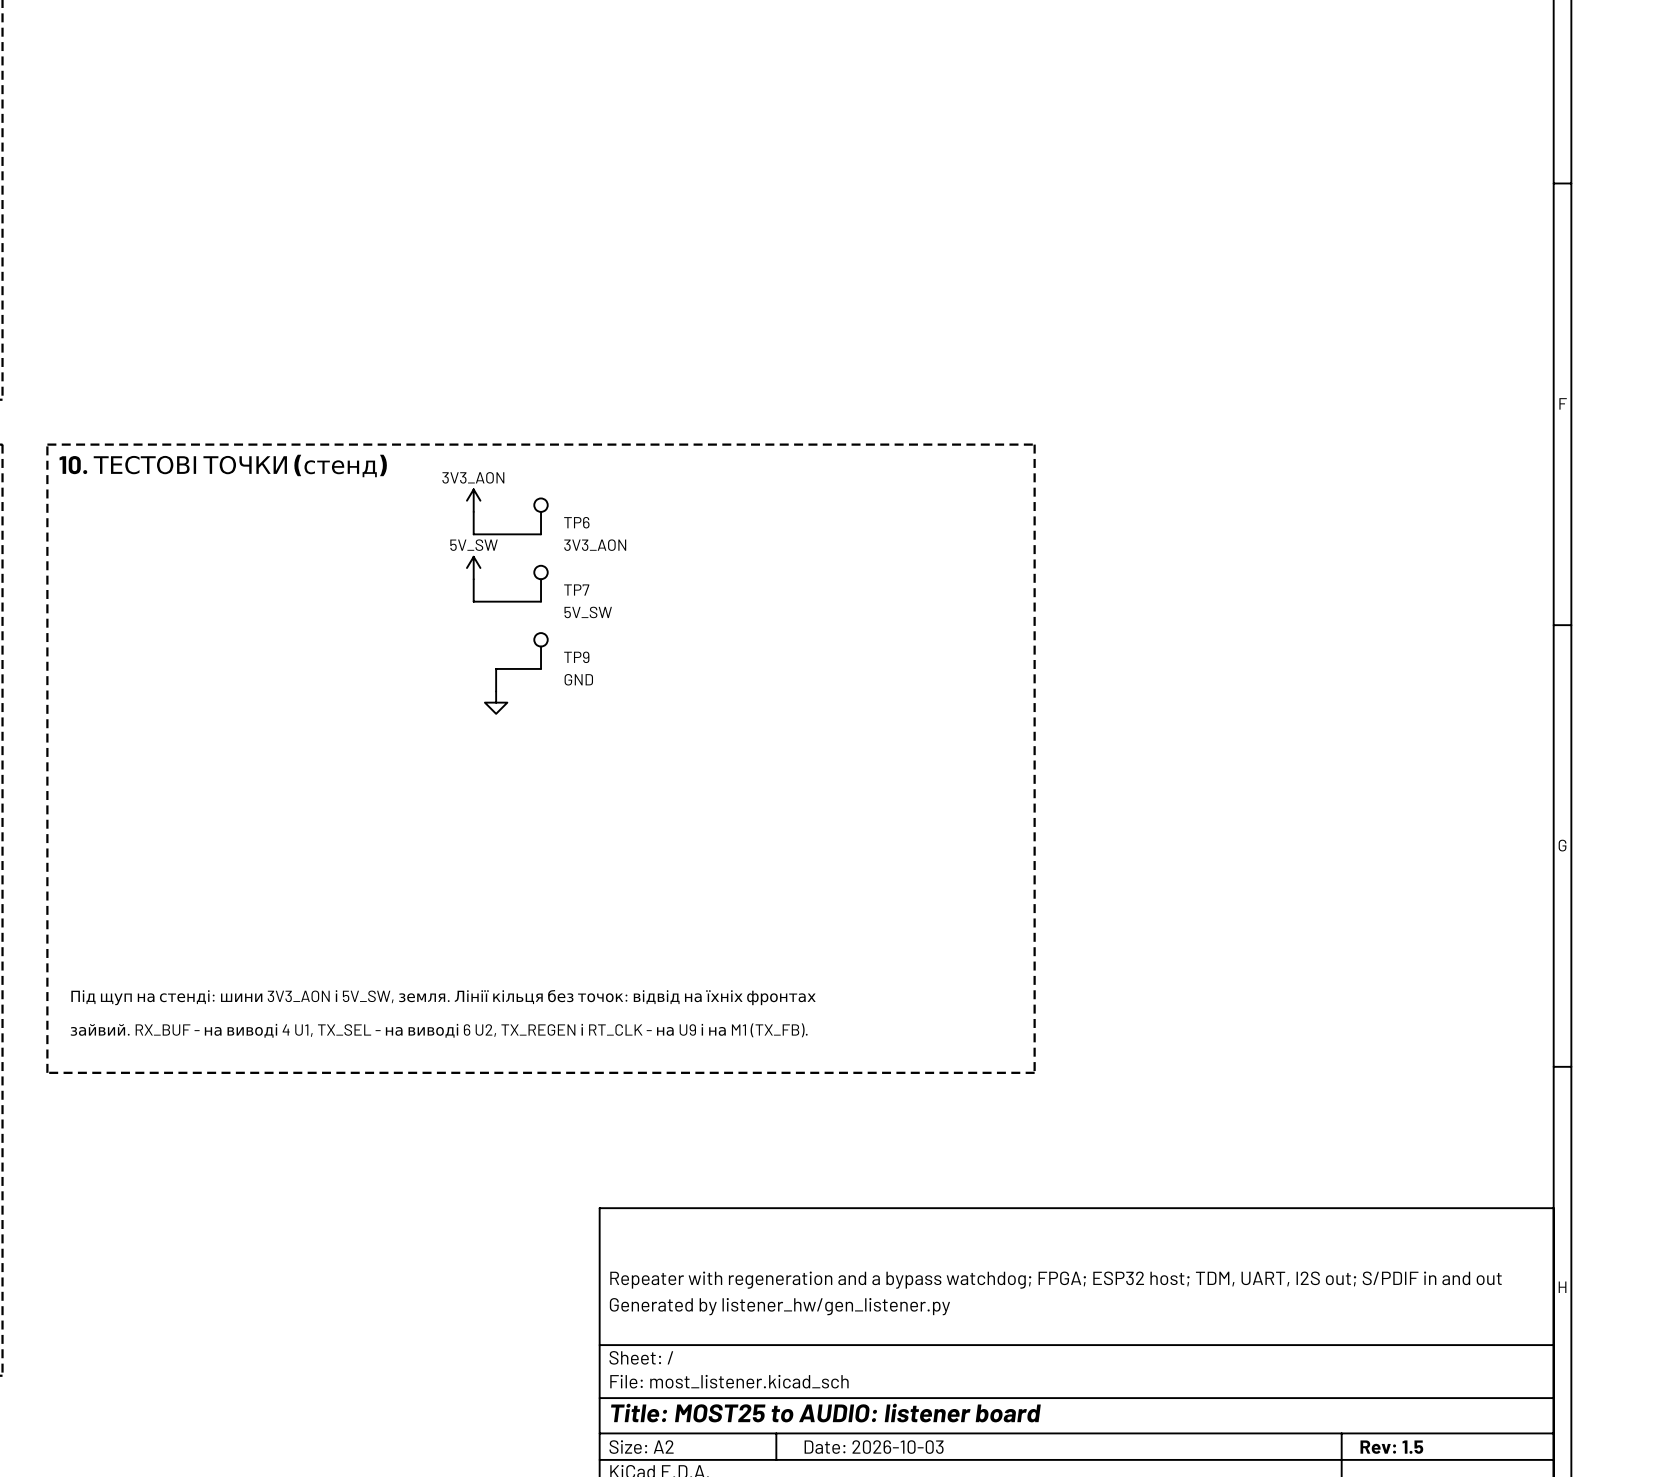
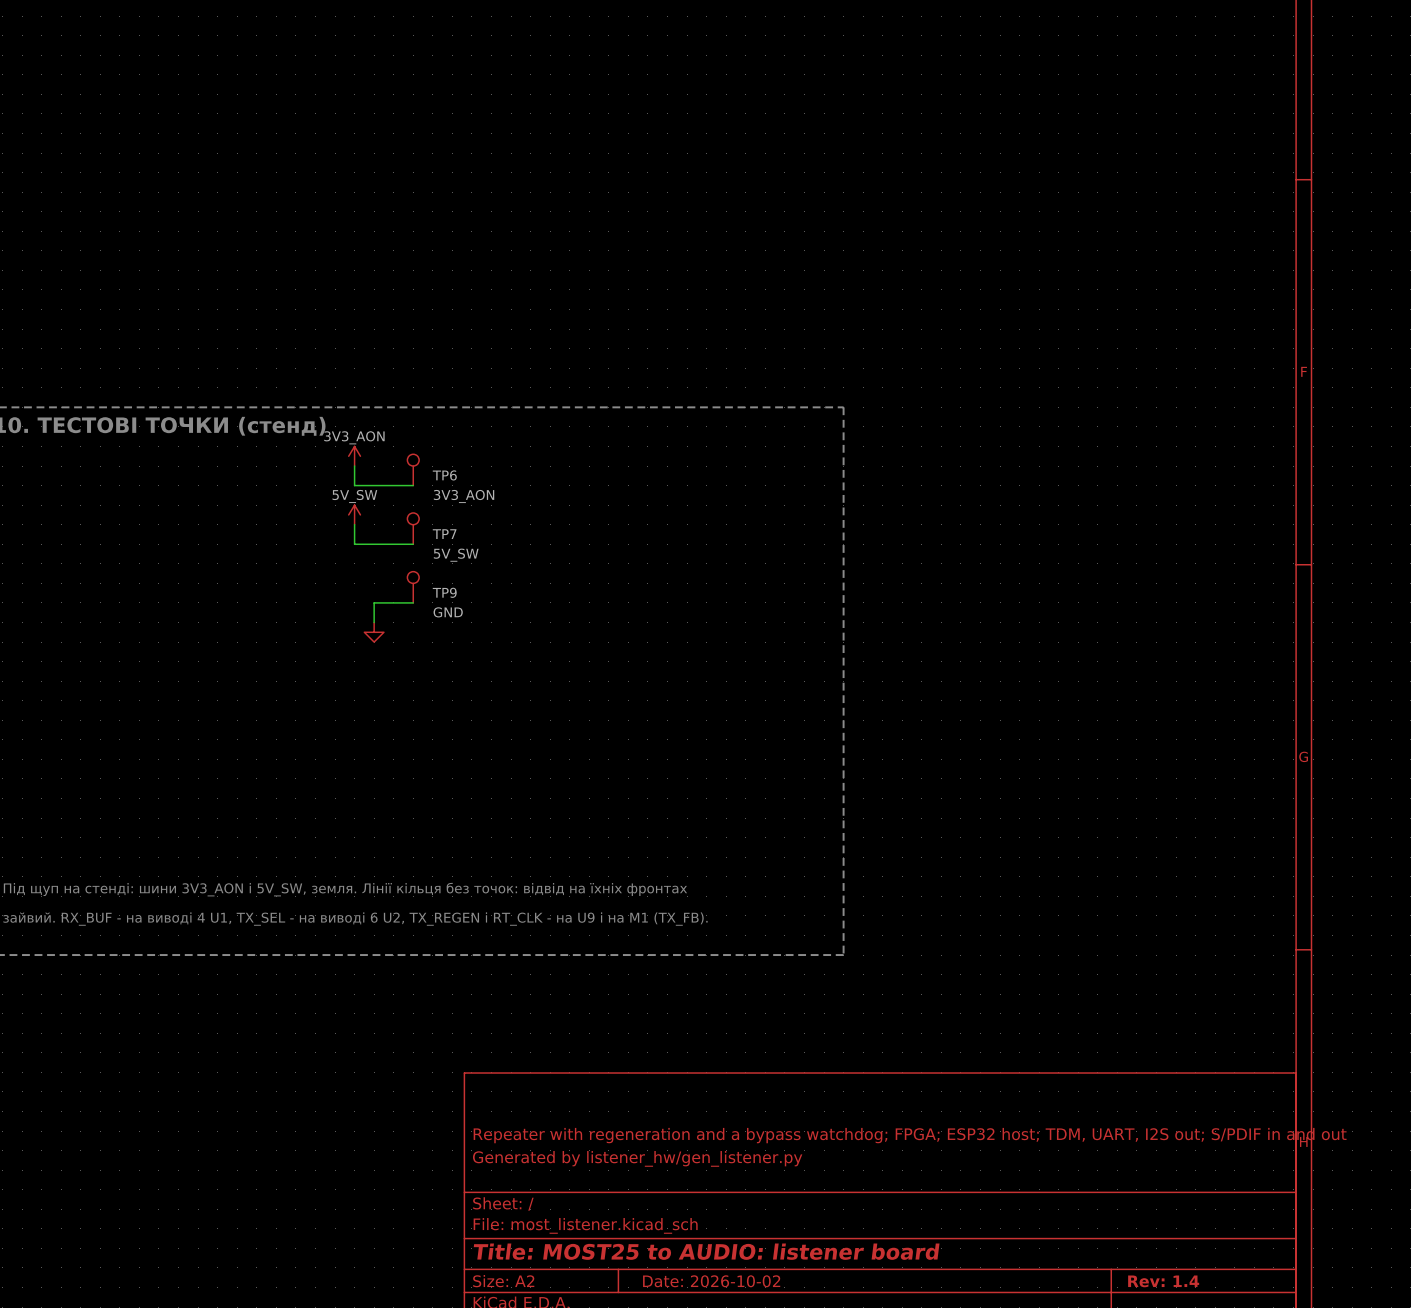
title block: Date: 2026-10-03 (874, 1447) -> Date: 2026-10-02 (711, 1281)
title block: Rev: 1.5 (1391, 1447) -> Rev: 1.4 (1163, 1281)

